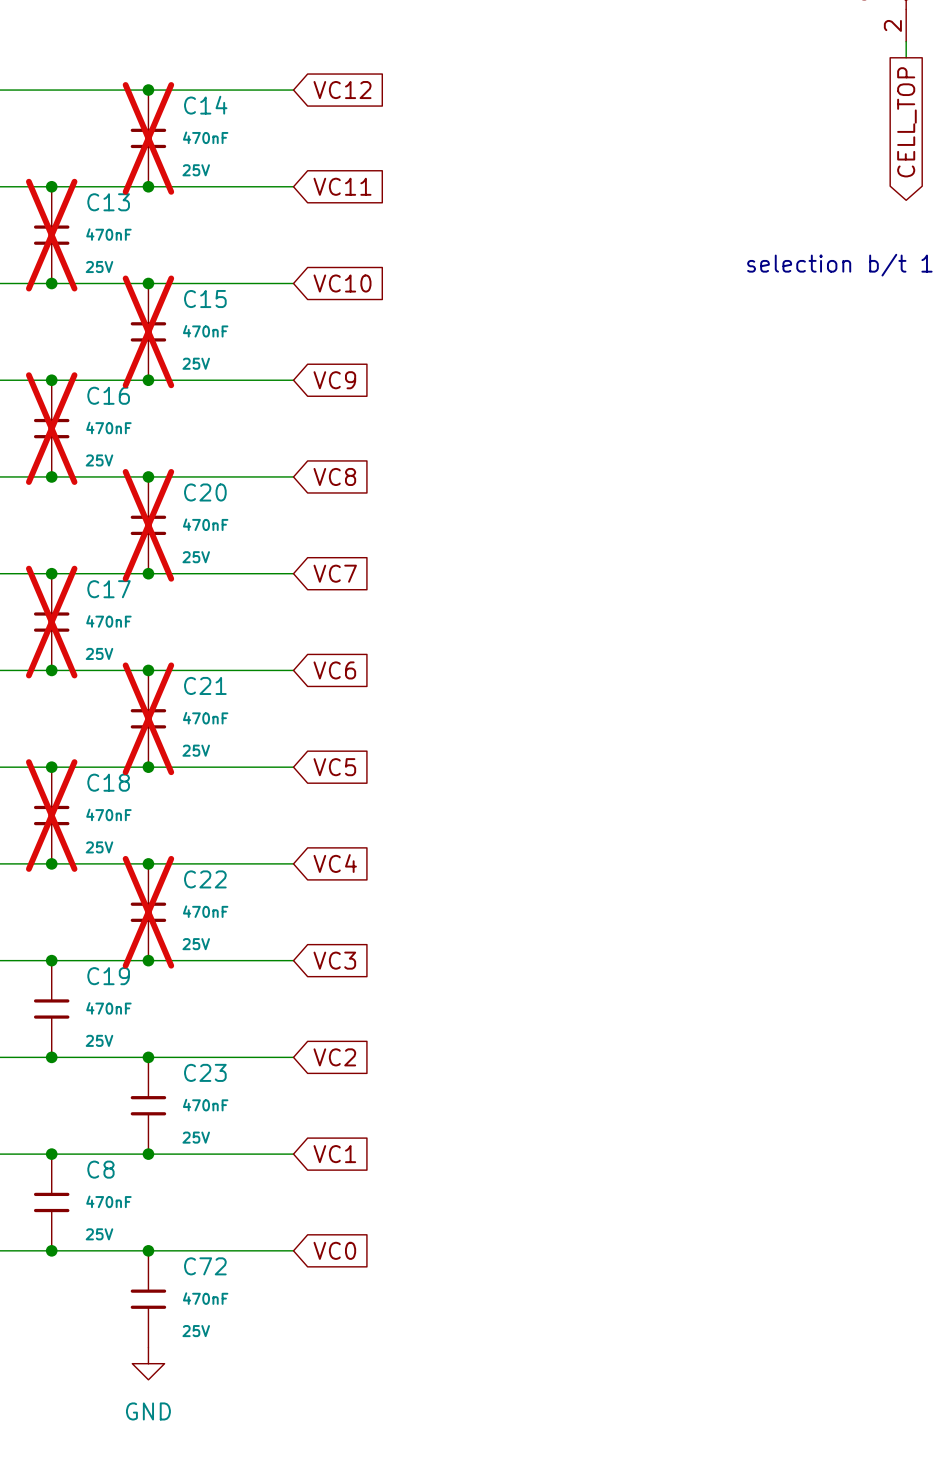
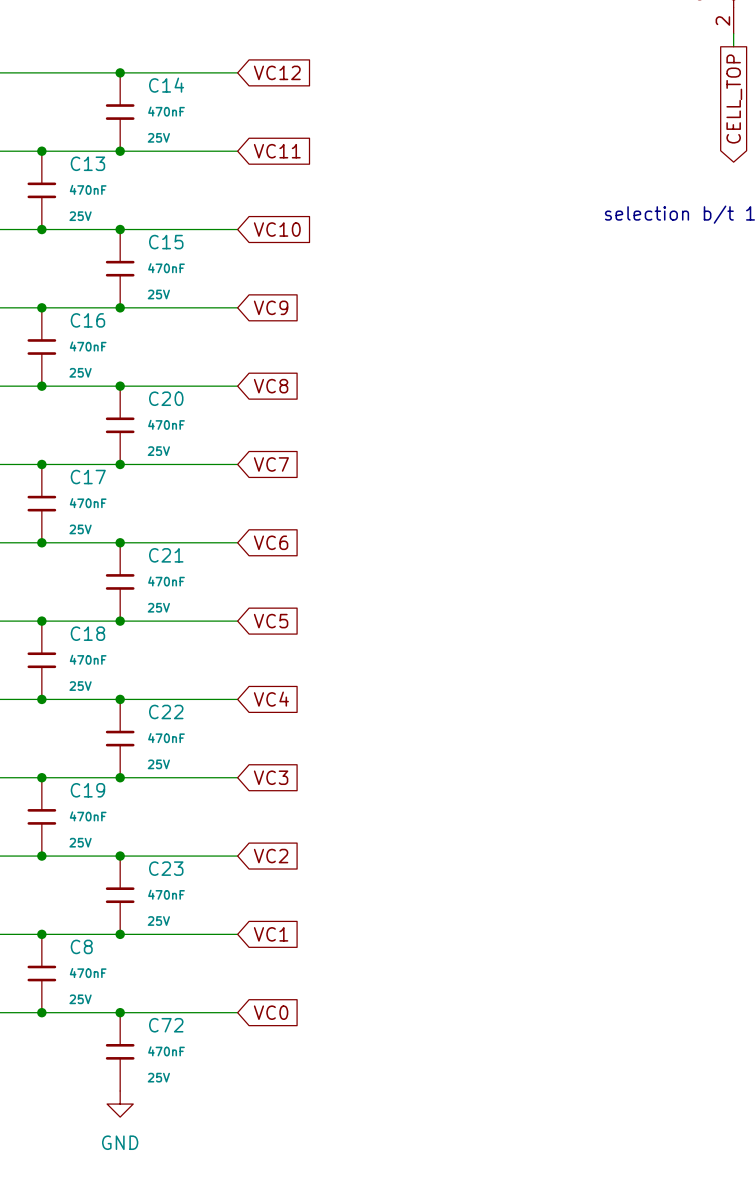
C14 do-not-place cross: (148, 138) -> none
C13 do-not-place cross: (51, 235) -> none
C15 do-not-place cross: (148, 331) -> none
C16 do-not-place cross: (51, 428) -> none
C20 do-not-place cross: (148, 525) -> none
C17 do-not-place cross: (51, 622) -> none
C21 do-not-place cross: (148, 718) -> none
C18 do-not-place cross: (51, 815) -> none
C22 do-not-place cross: (148, 912) -> none

